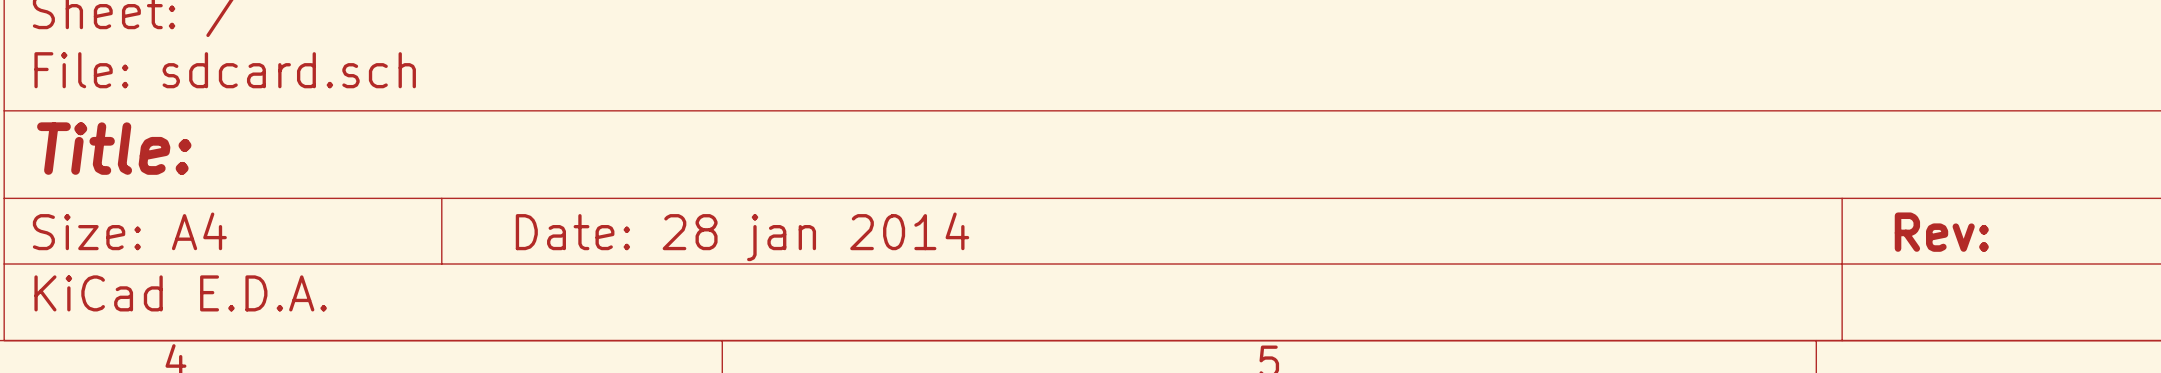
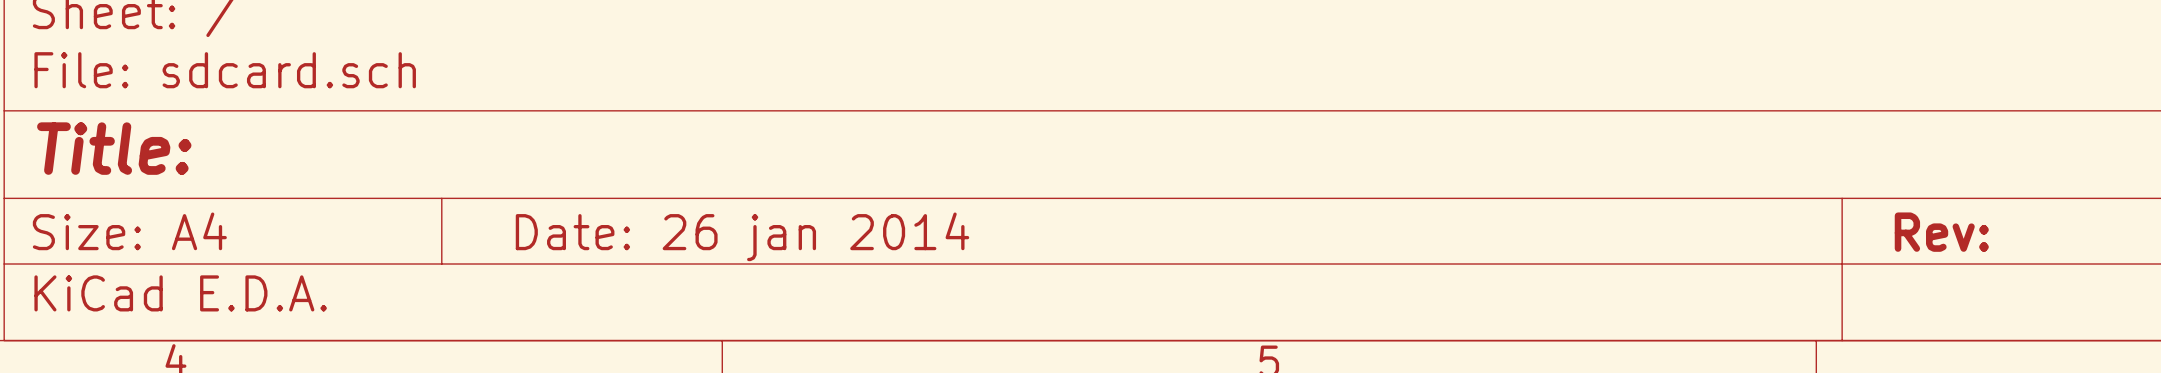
title block: Date: 28 jan 2014 (742, 236) -> Date: 26 jan 2014 (742, 236)

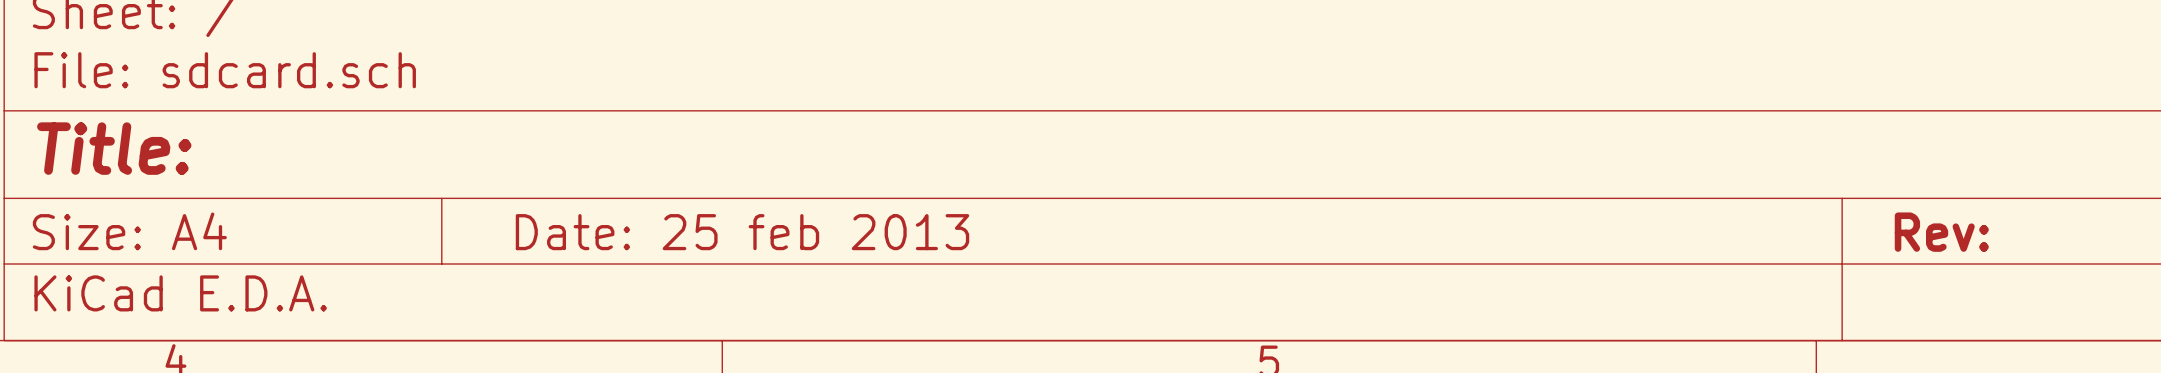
title block: Date: 26 jan 2014 (742, 236) -> Date: 25 feb 2013 (742, 232)

